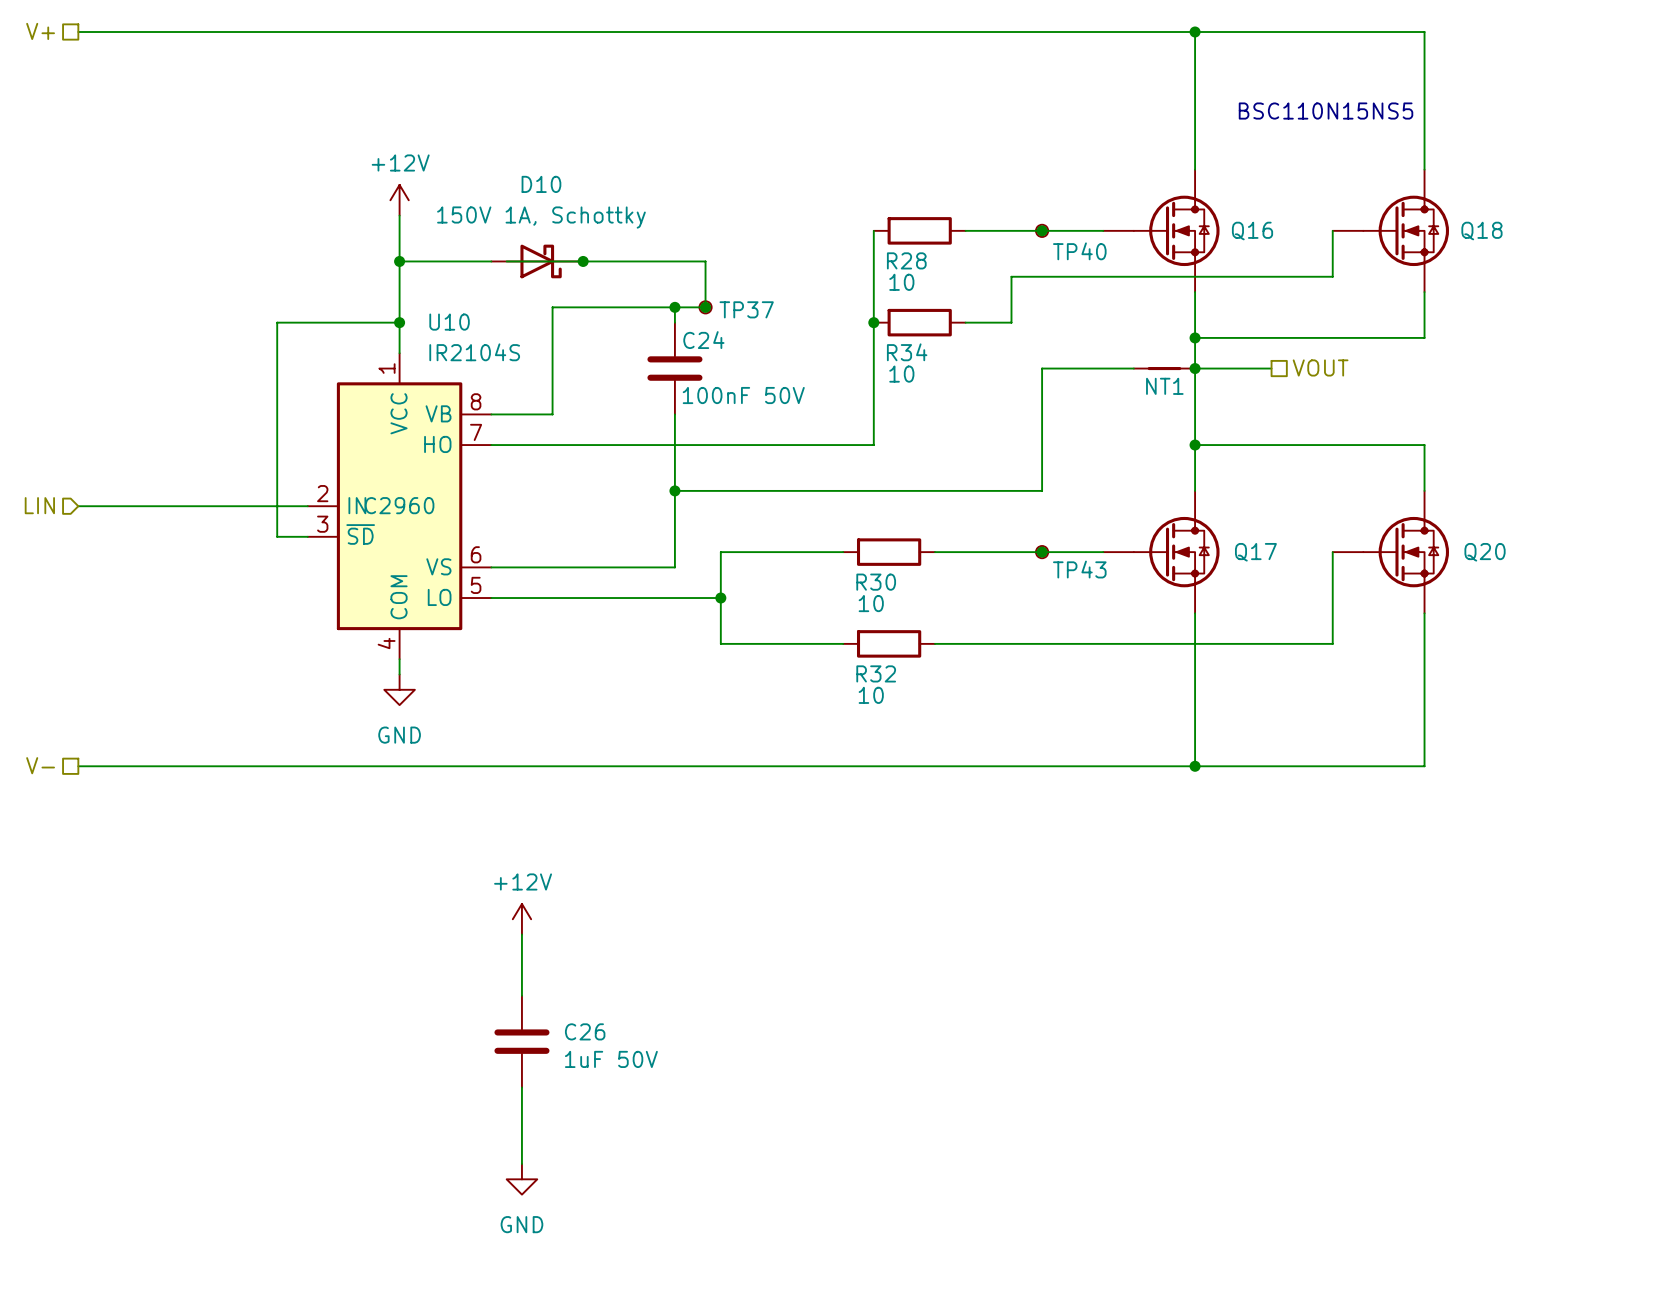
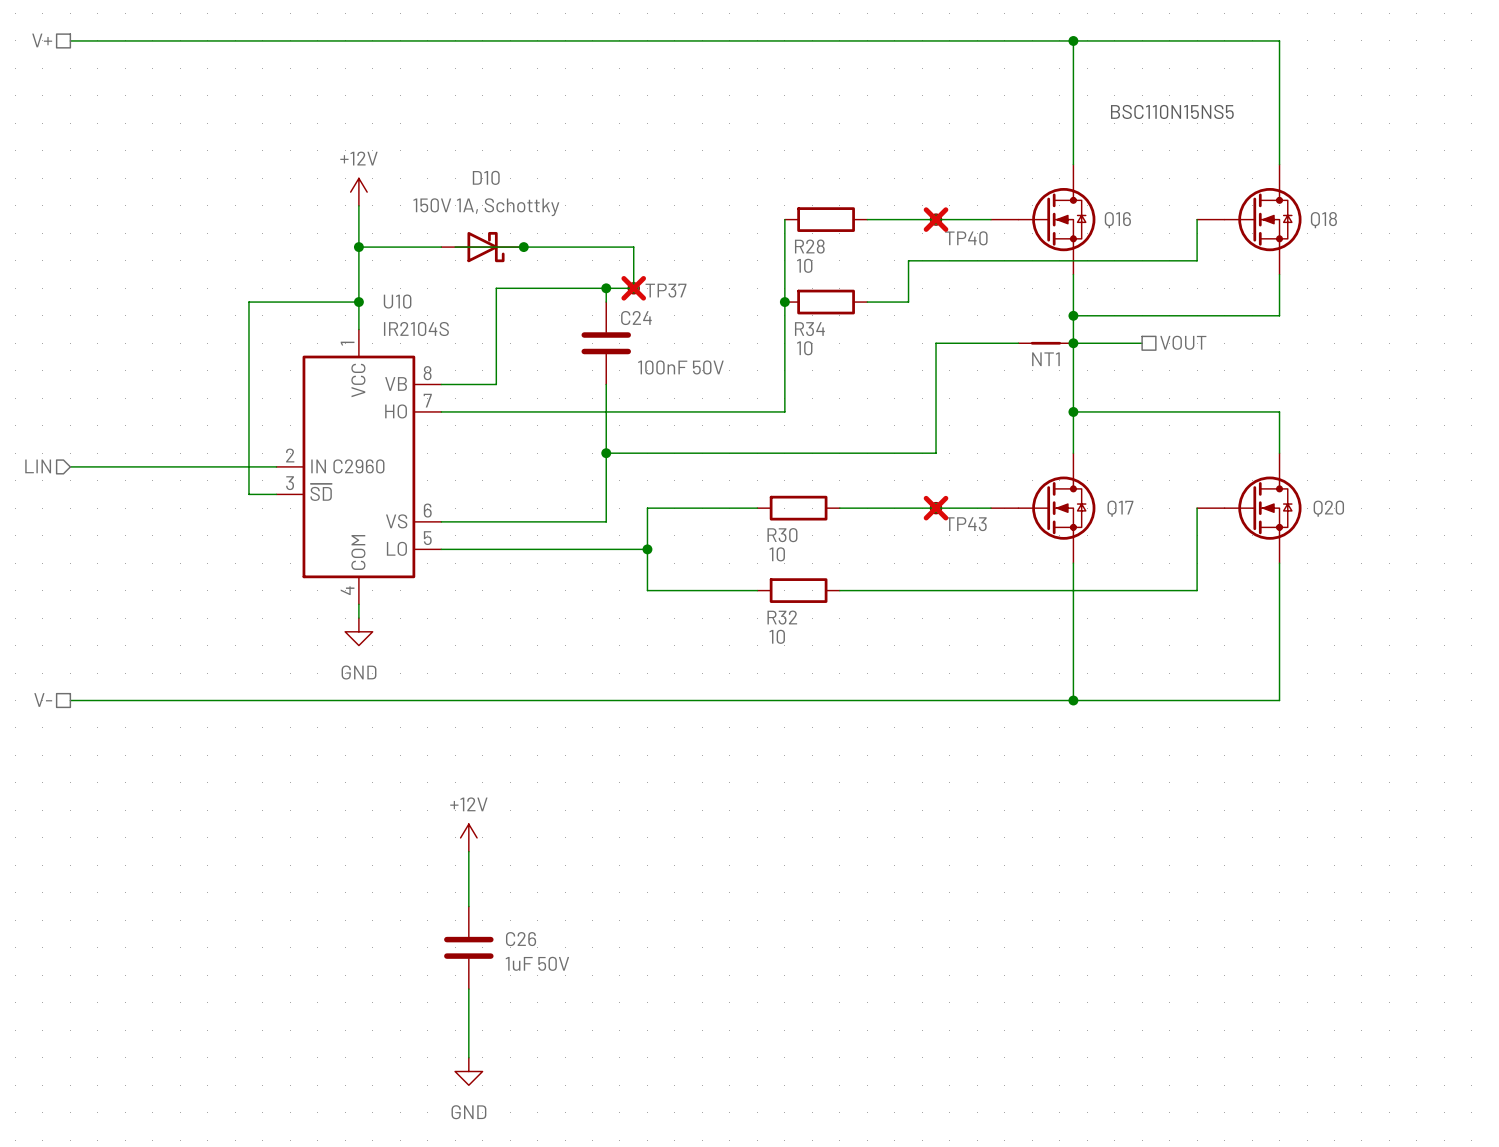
TP40 do-not-place cross: none -> (936, 219)
TP37 do-not-place cross: none -> (633, 288)
TP43 do-not-place cross: none -> (936, 508)

